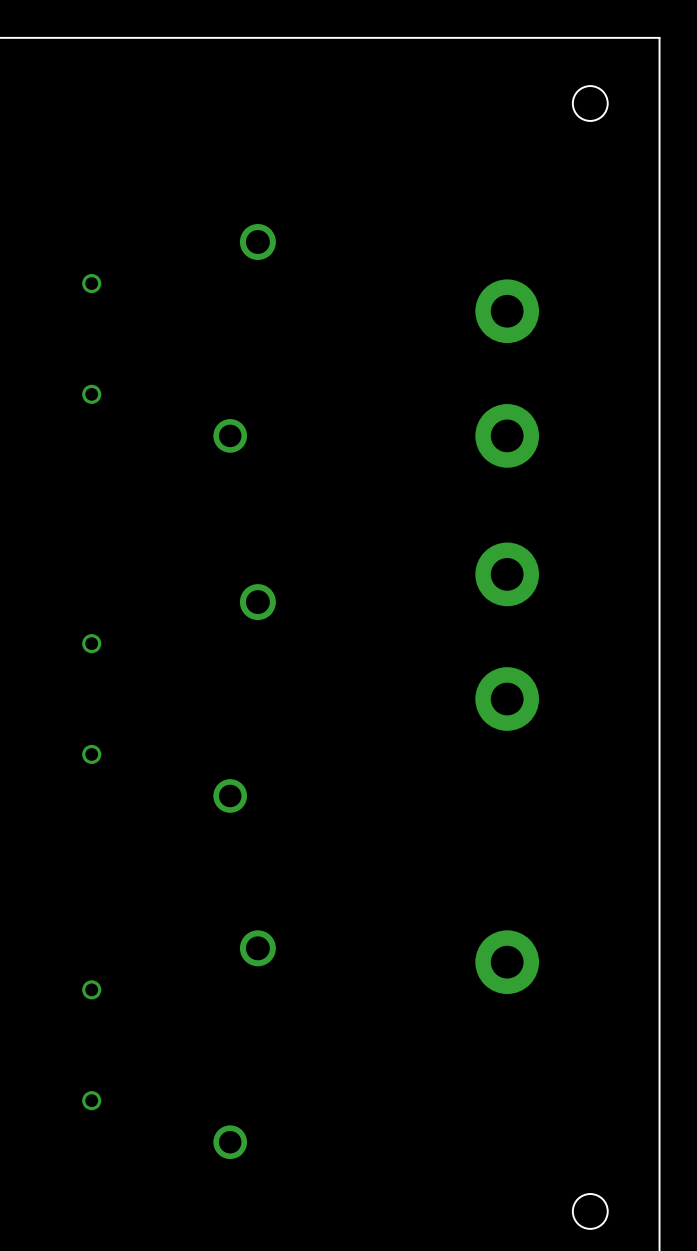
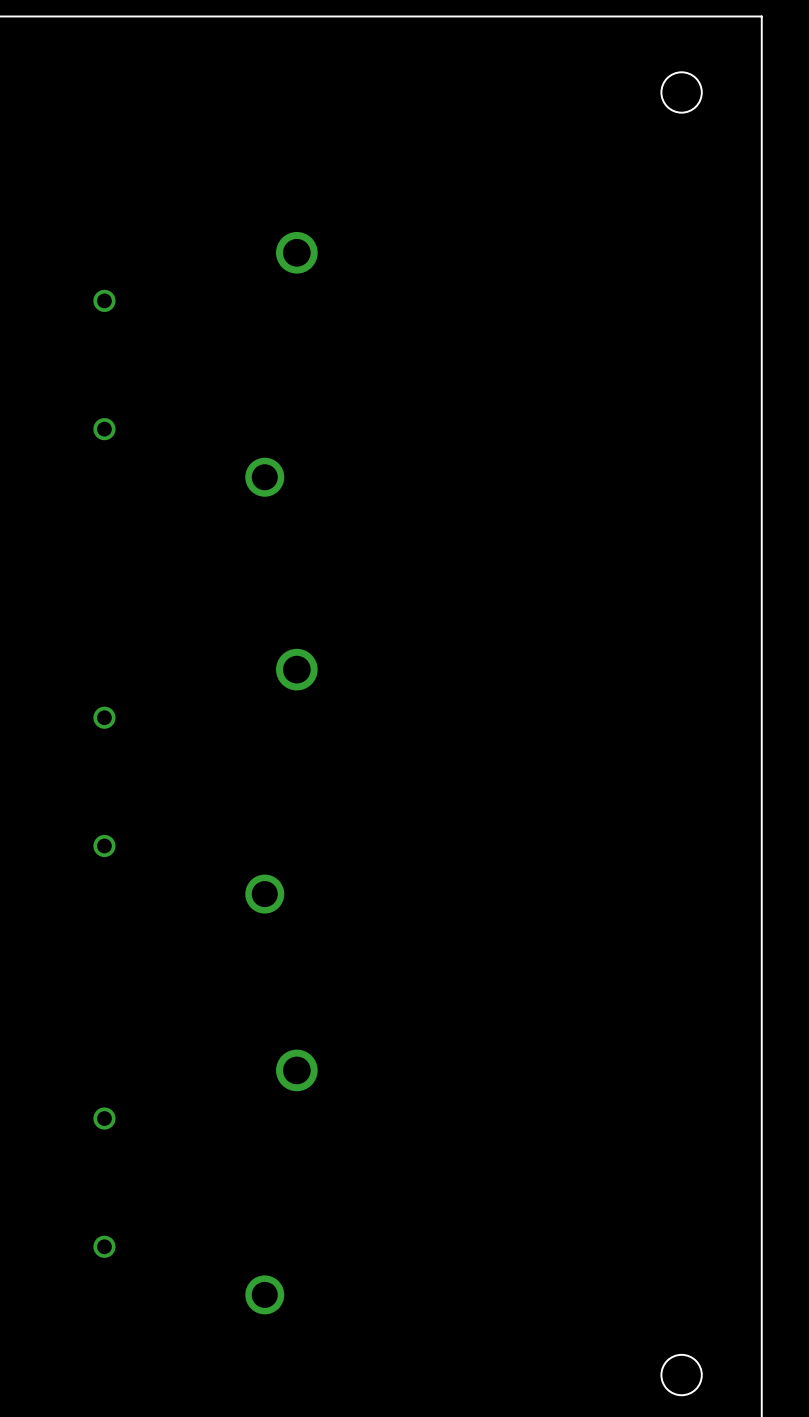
part: (507, 311) -> none
part: (507, 435) -> none
part: (507, 574) -> none
part: (507, 699) -> none
part: (507, 962) -> none

